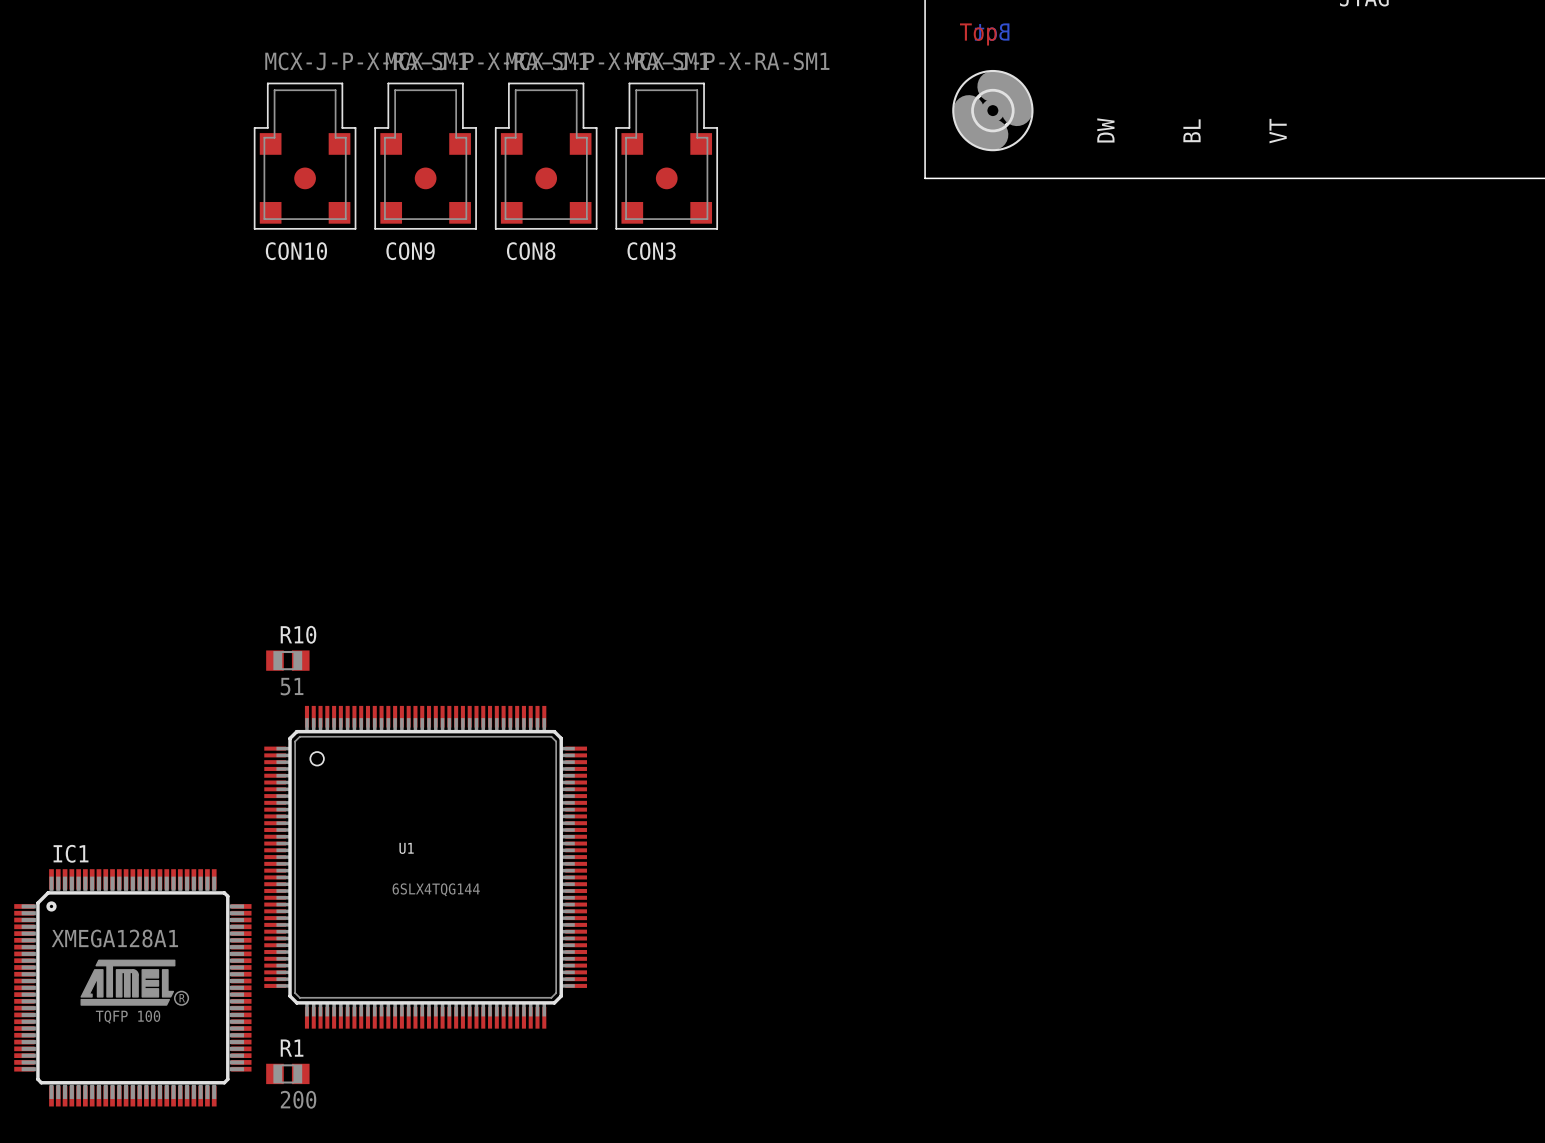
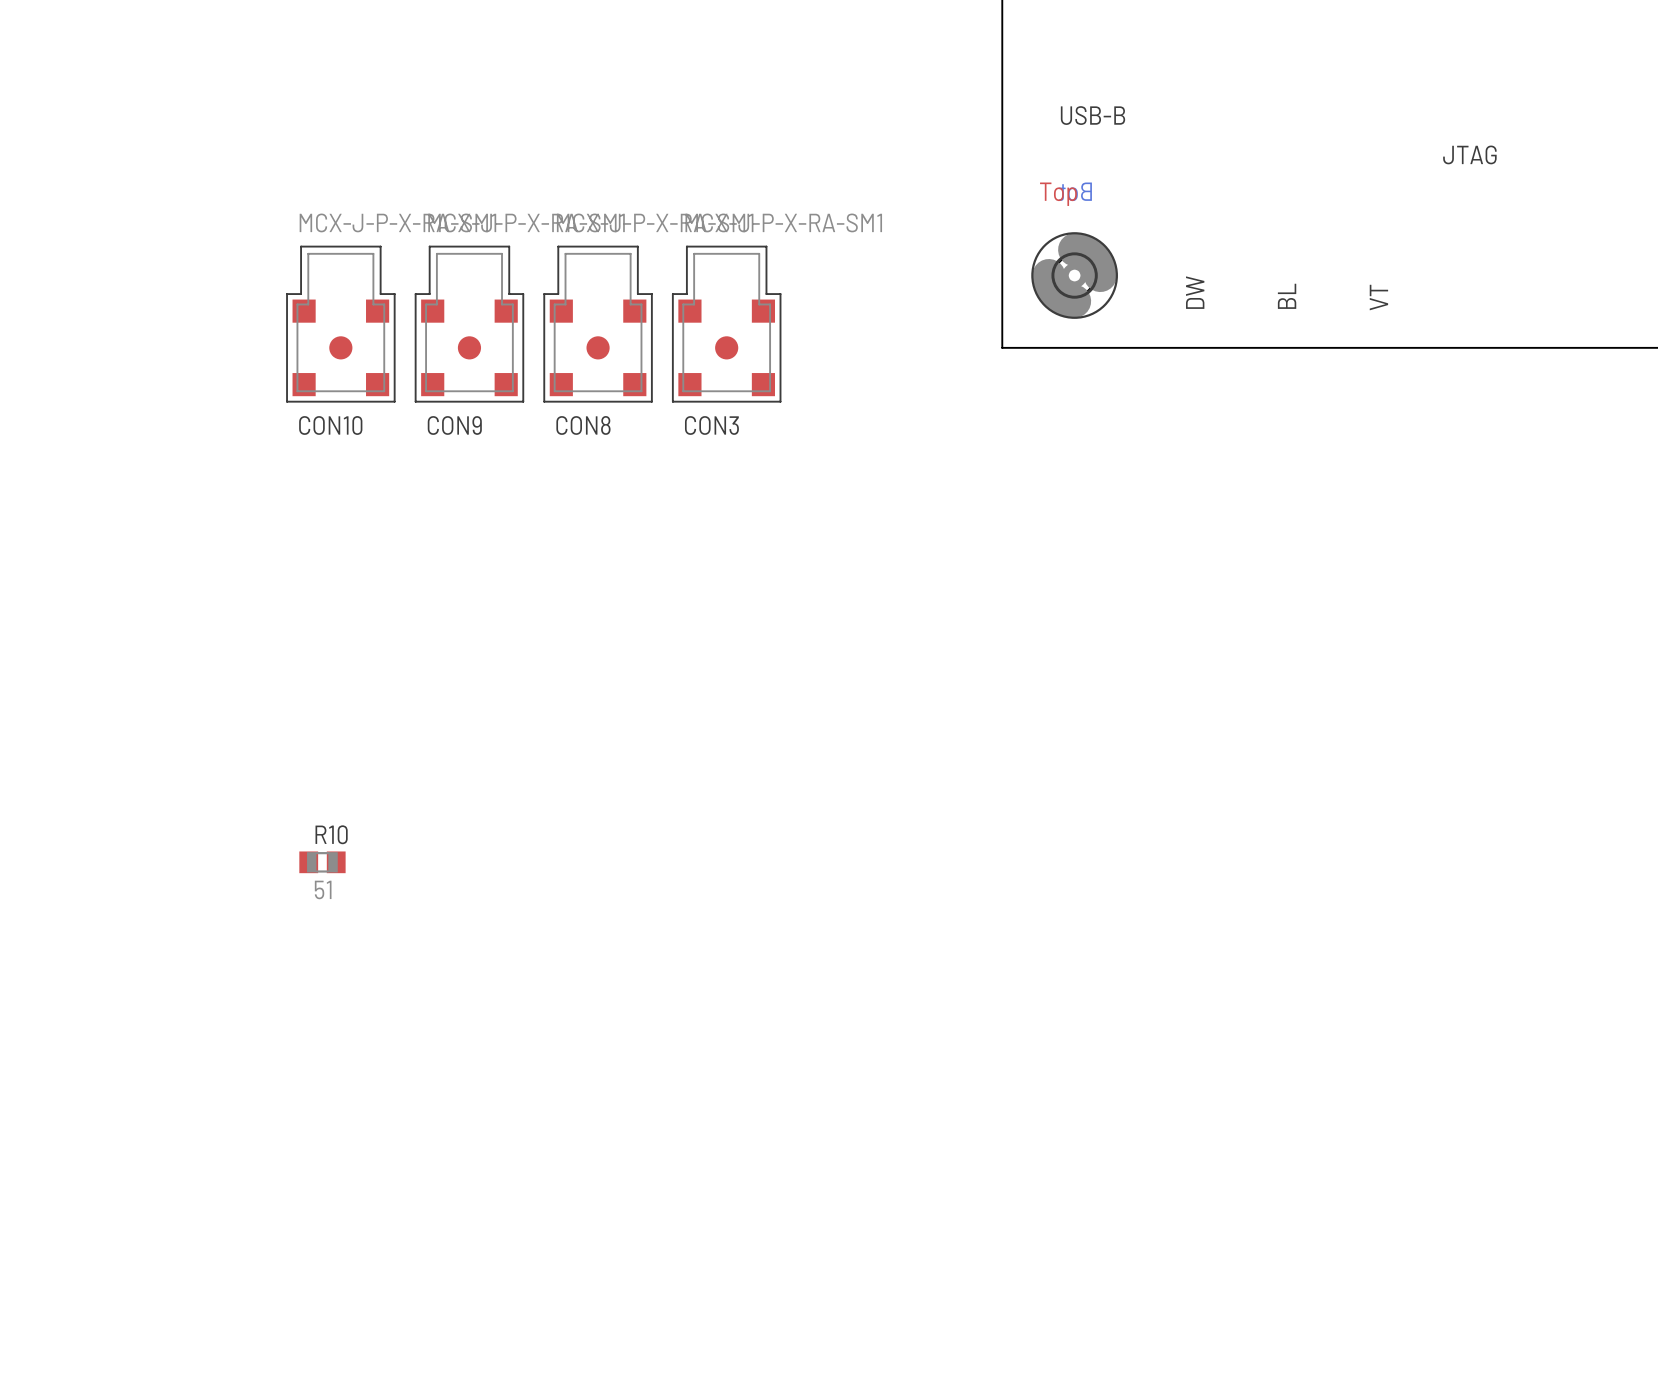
U1: 6SLX4TQG144 (425, 867) -> none
IC1: XMEGA128A1 (132, 987) -> none
R1: 200 (287, 1073) -> none

